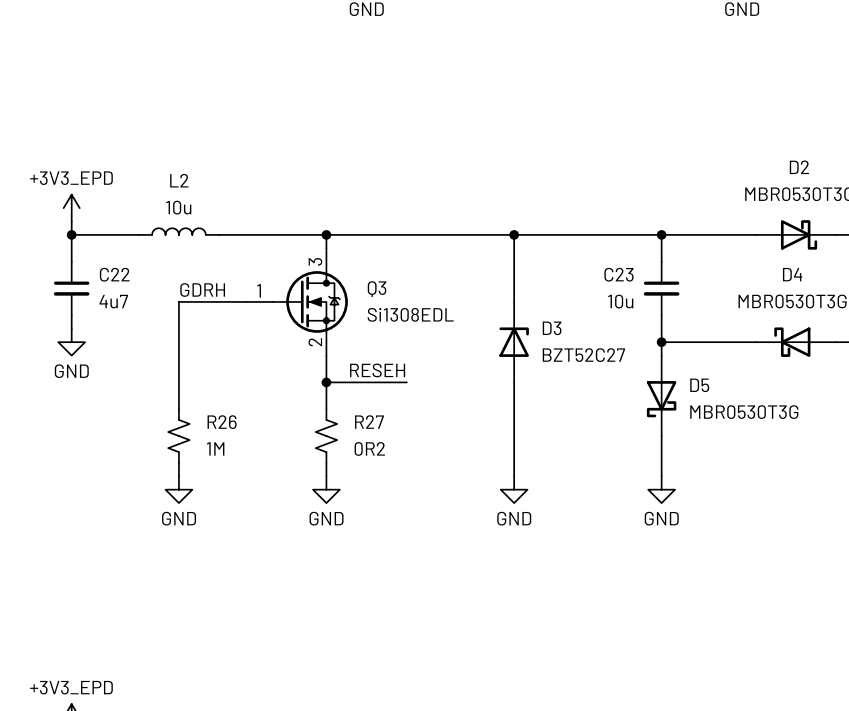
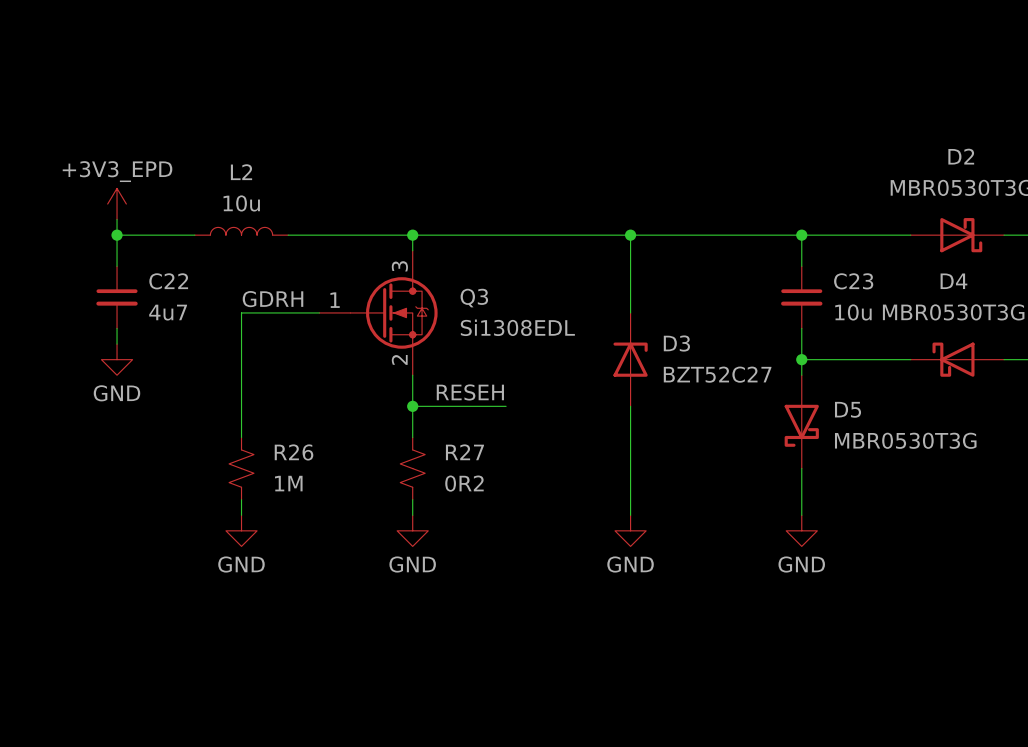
C23 name position: C23 (619, 274) -> C23 (853, 281)
C23 value position: 10u (620, 301) -> 10u (853, 312)

